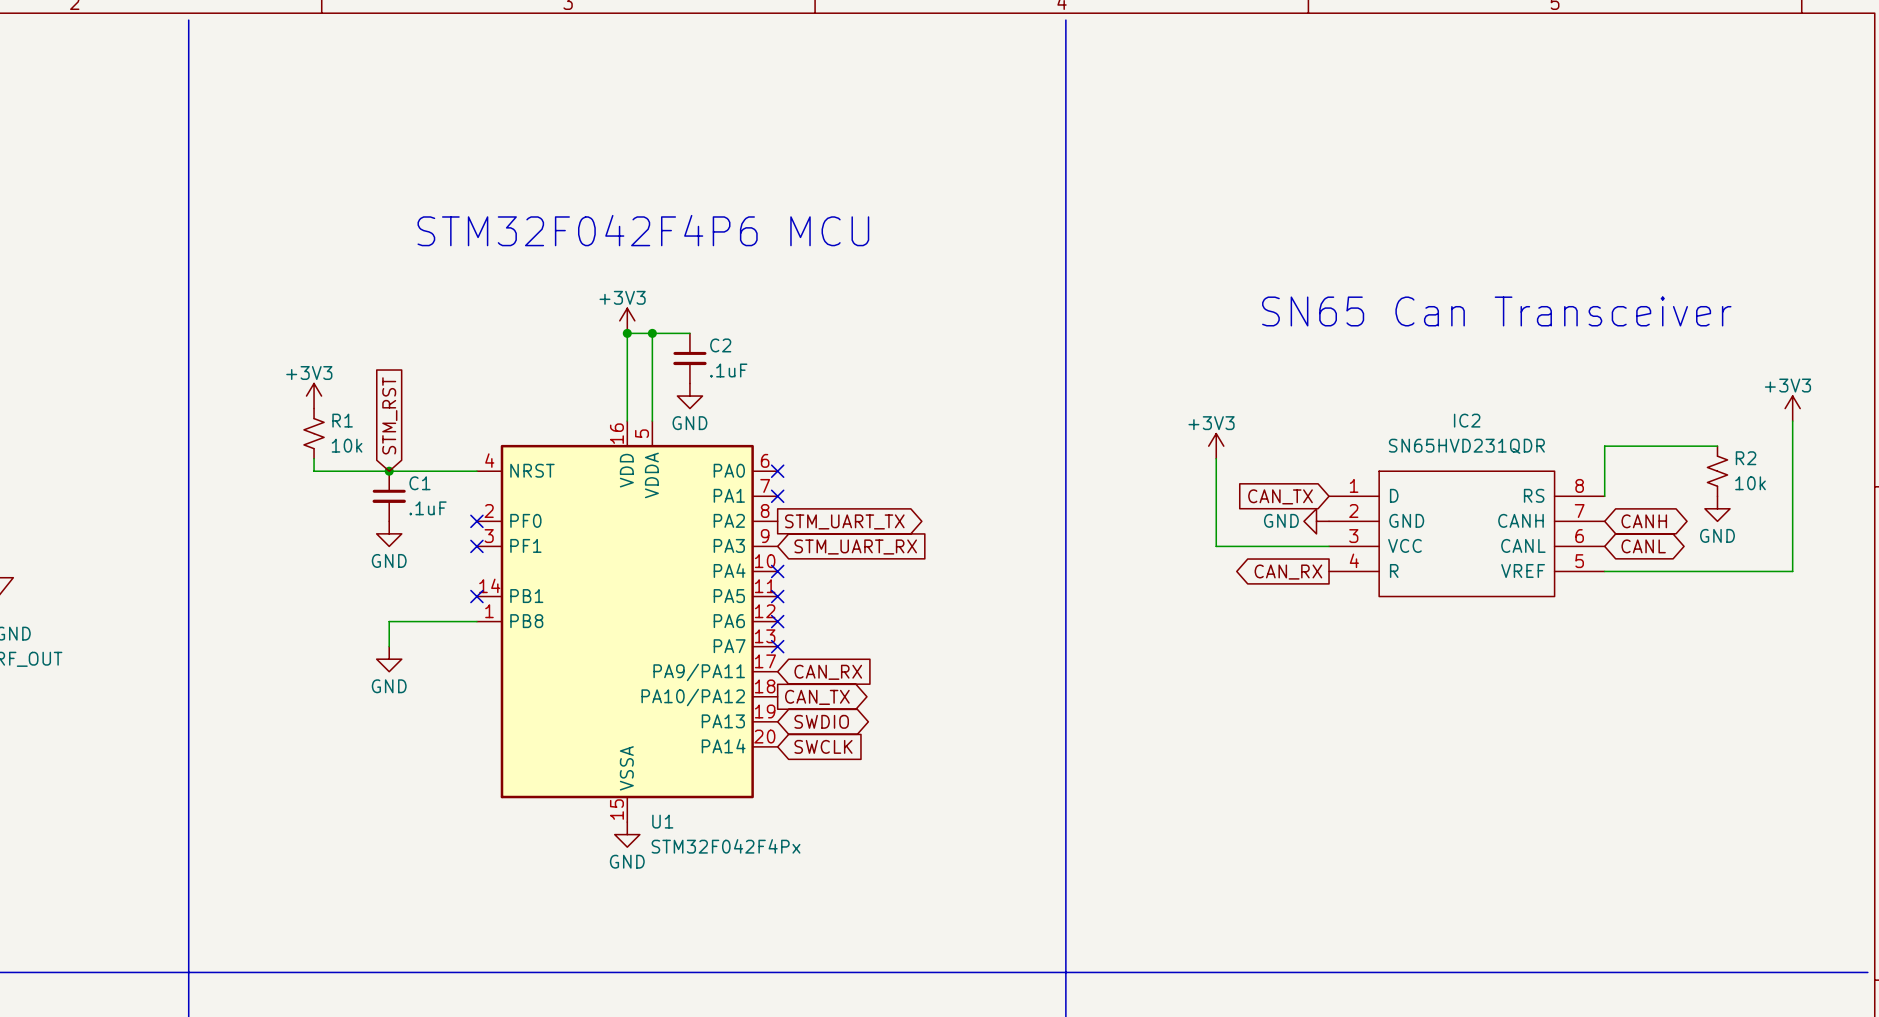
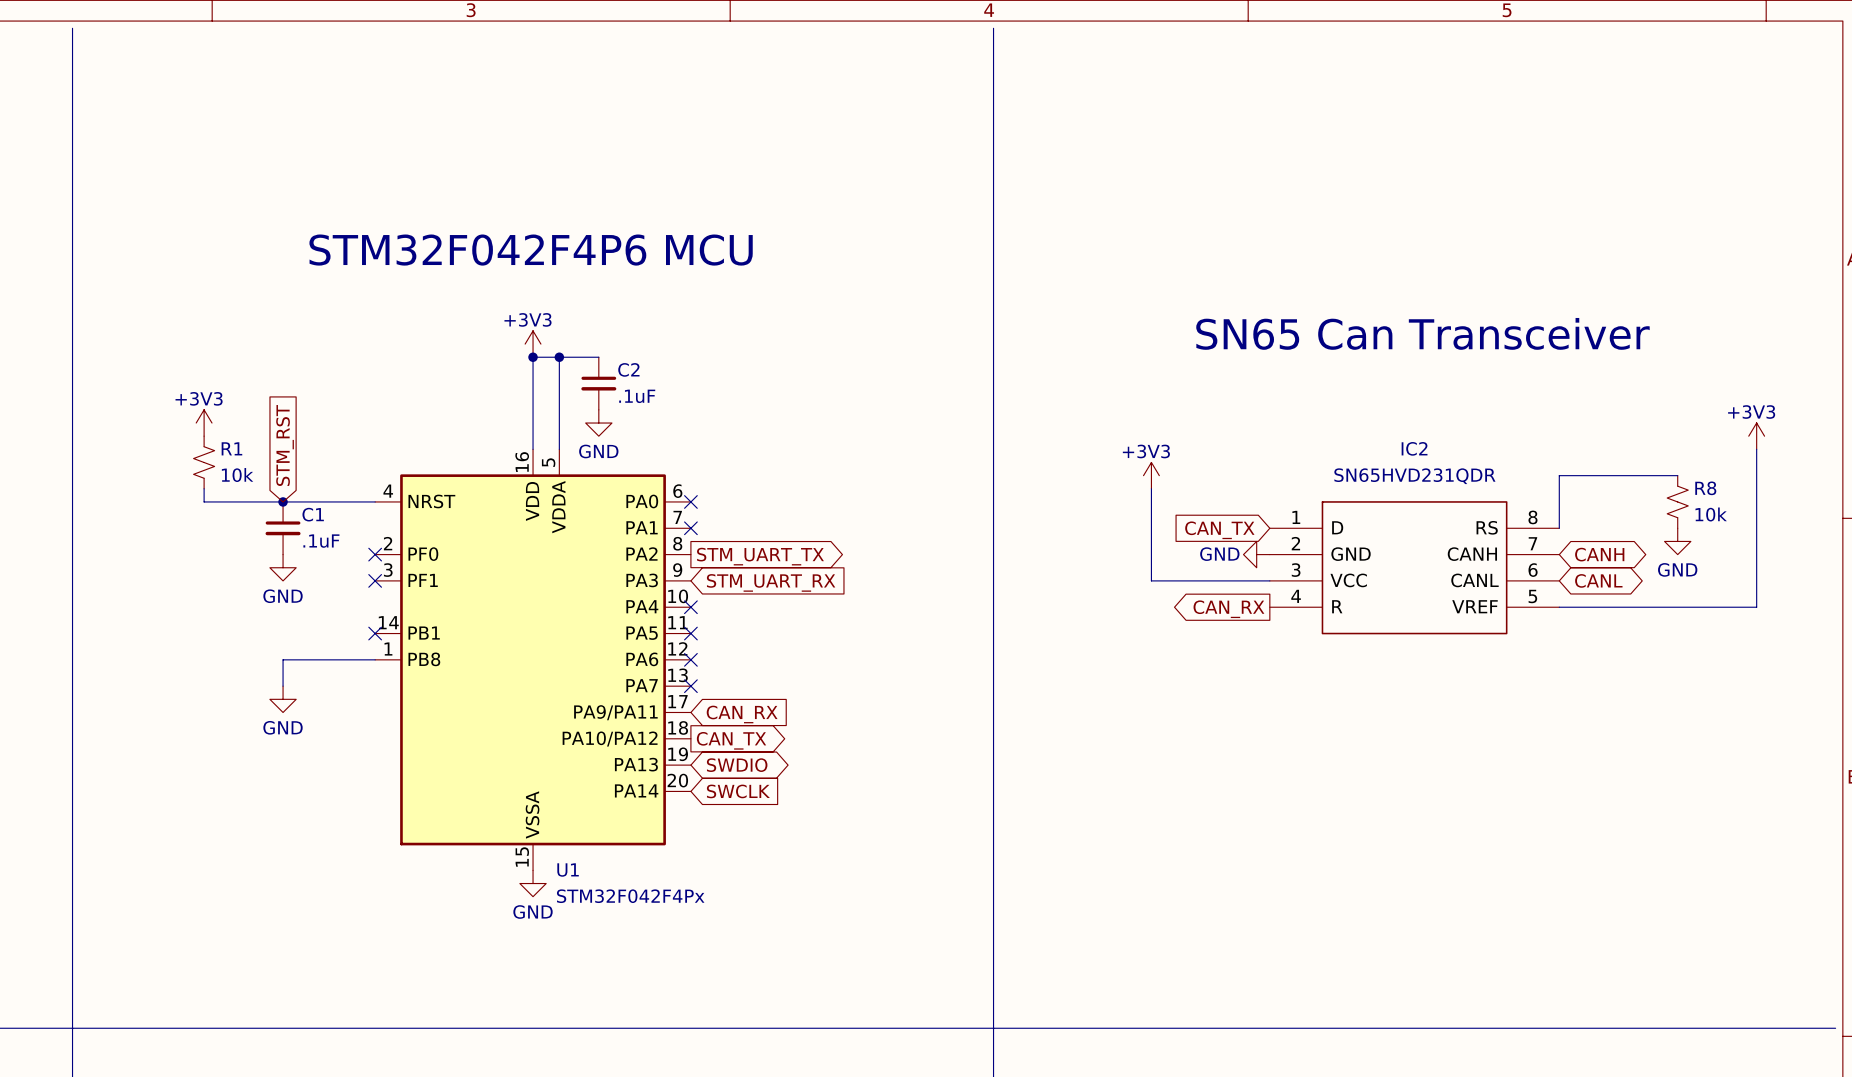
R2 name: R2 (1746, 458) -> R8 (1705, 488)

